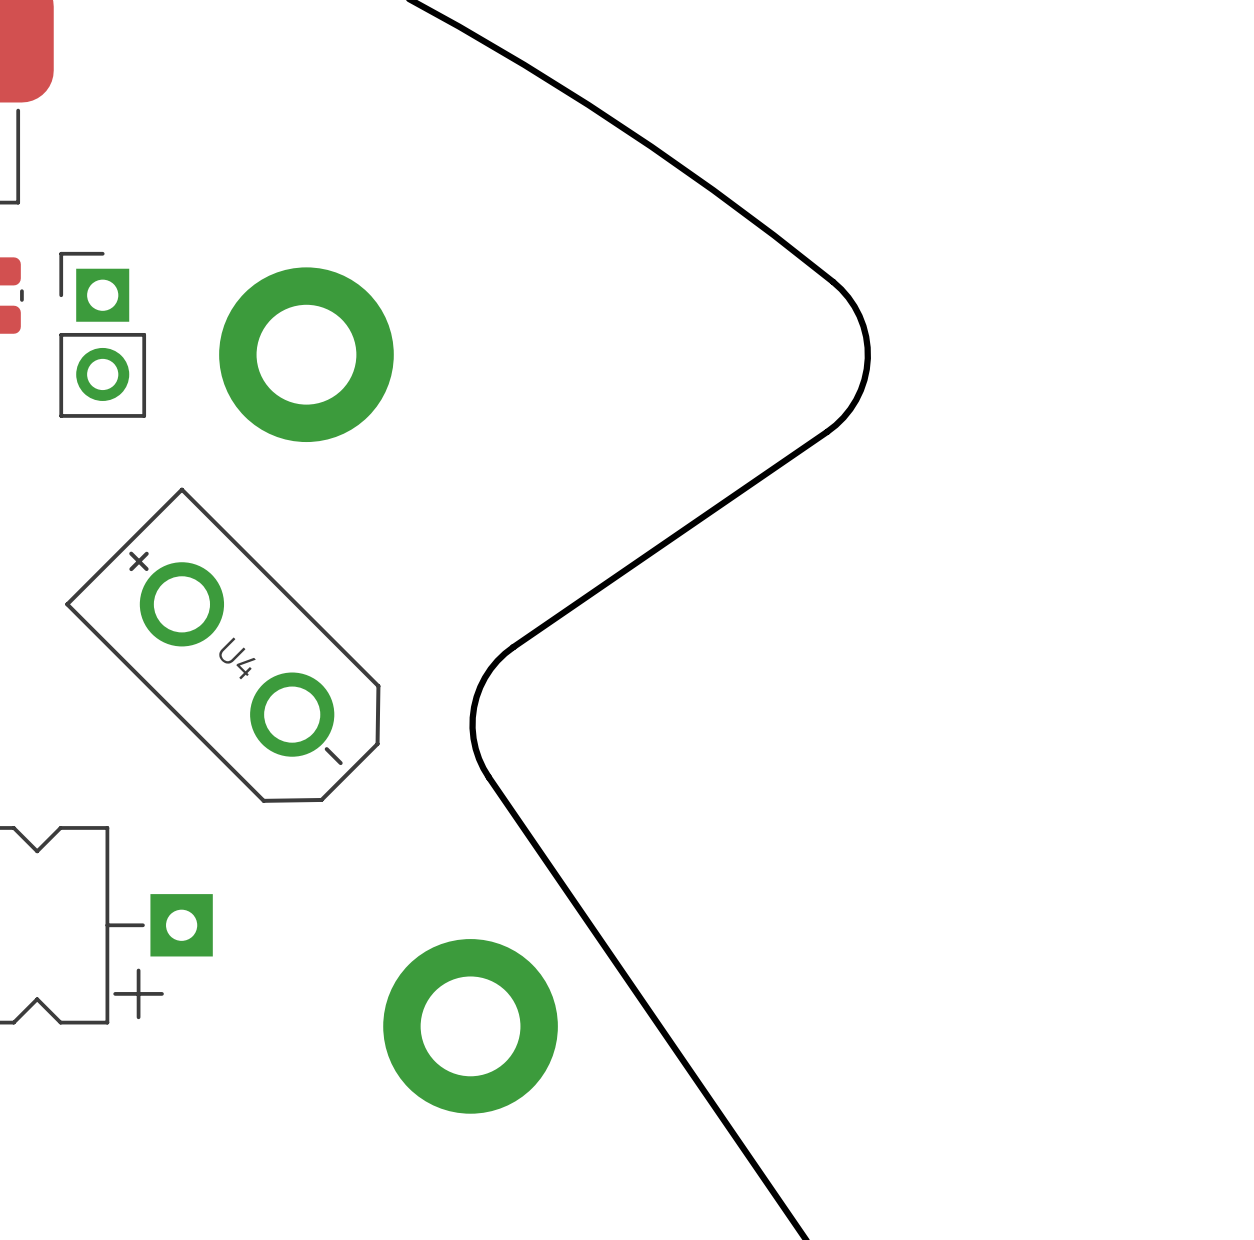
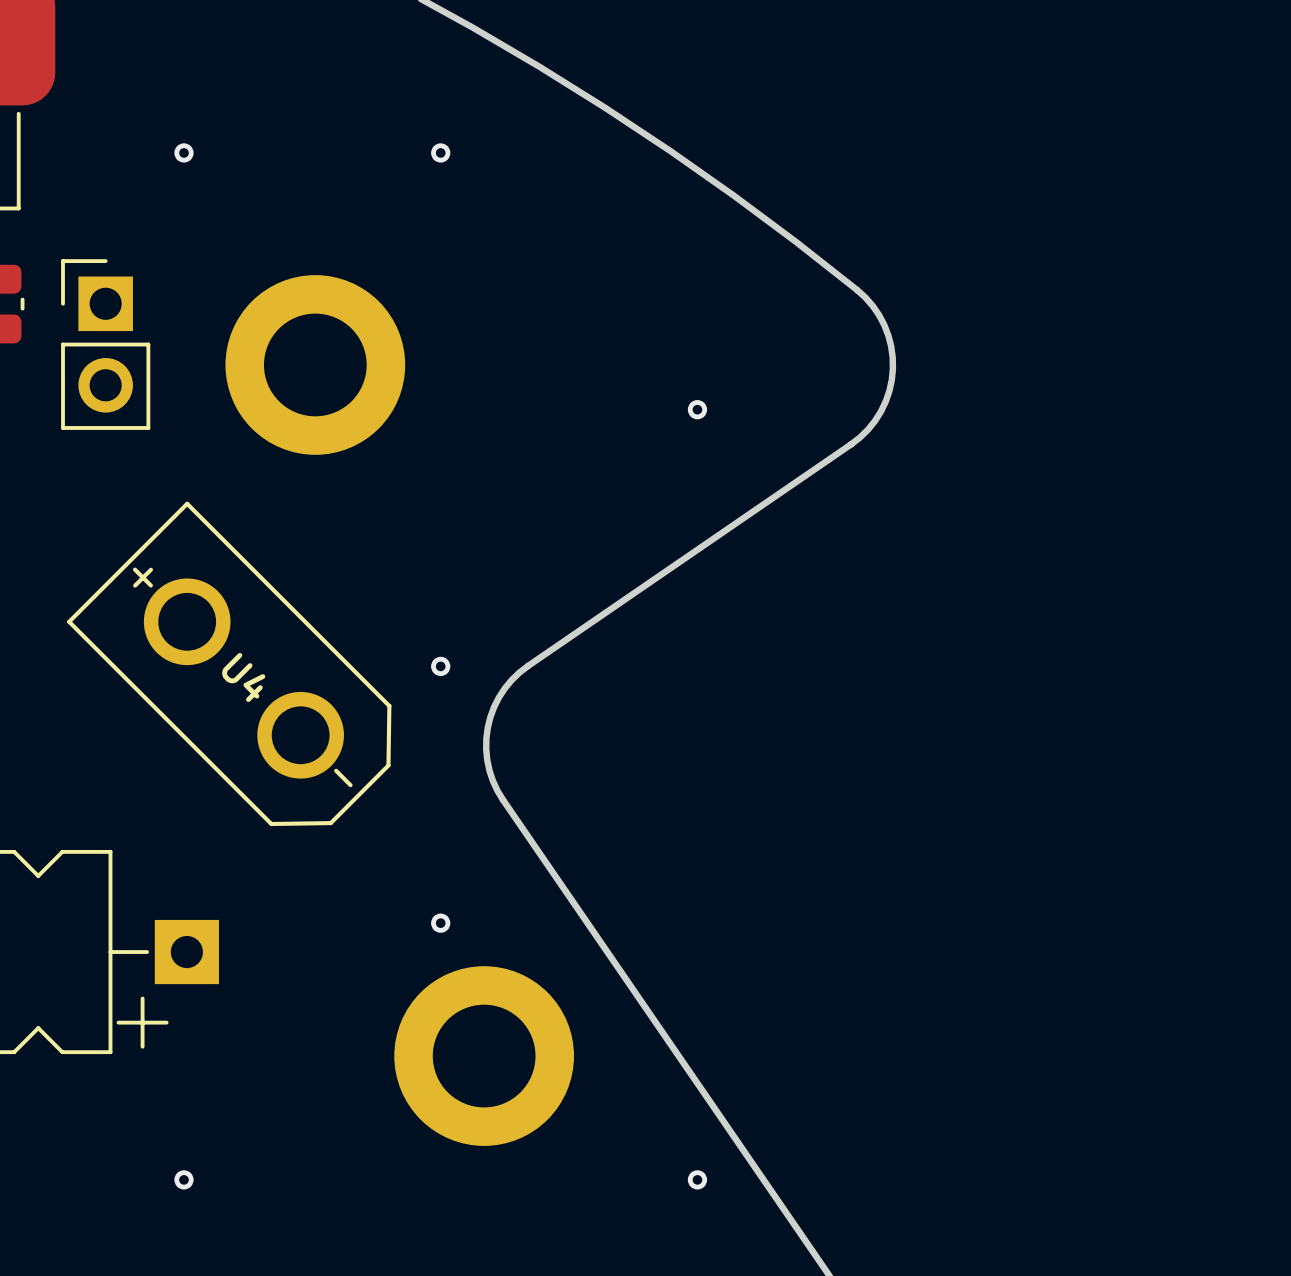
via: none -> (183, 152)
via: none -> (440, 152)
via: none -> (697, 409)
via: none -> (440, 666)
via: none -> (440, 923)
via: none -> (183, 1179)
via: none -> (697, 1179)

